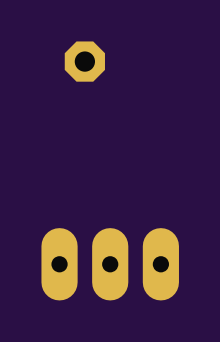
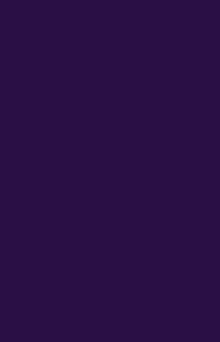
part: (84, 61) -> none
part: (110, 264) -> none

